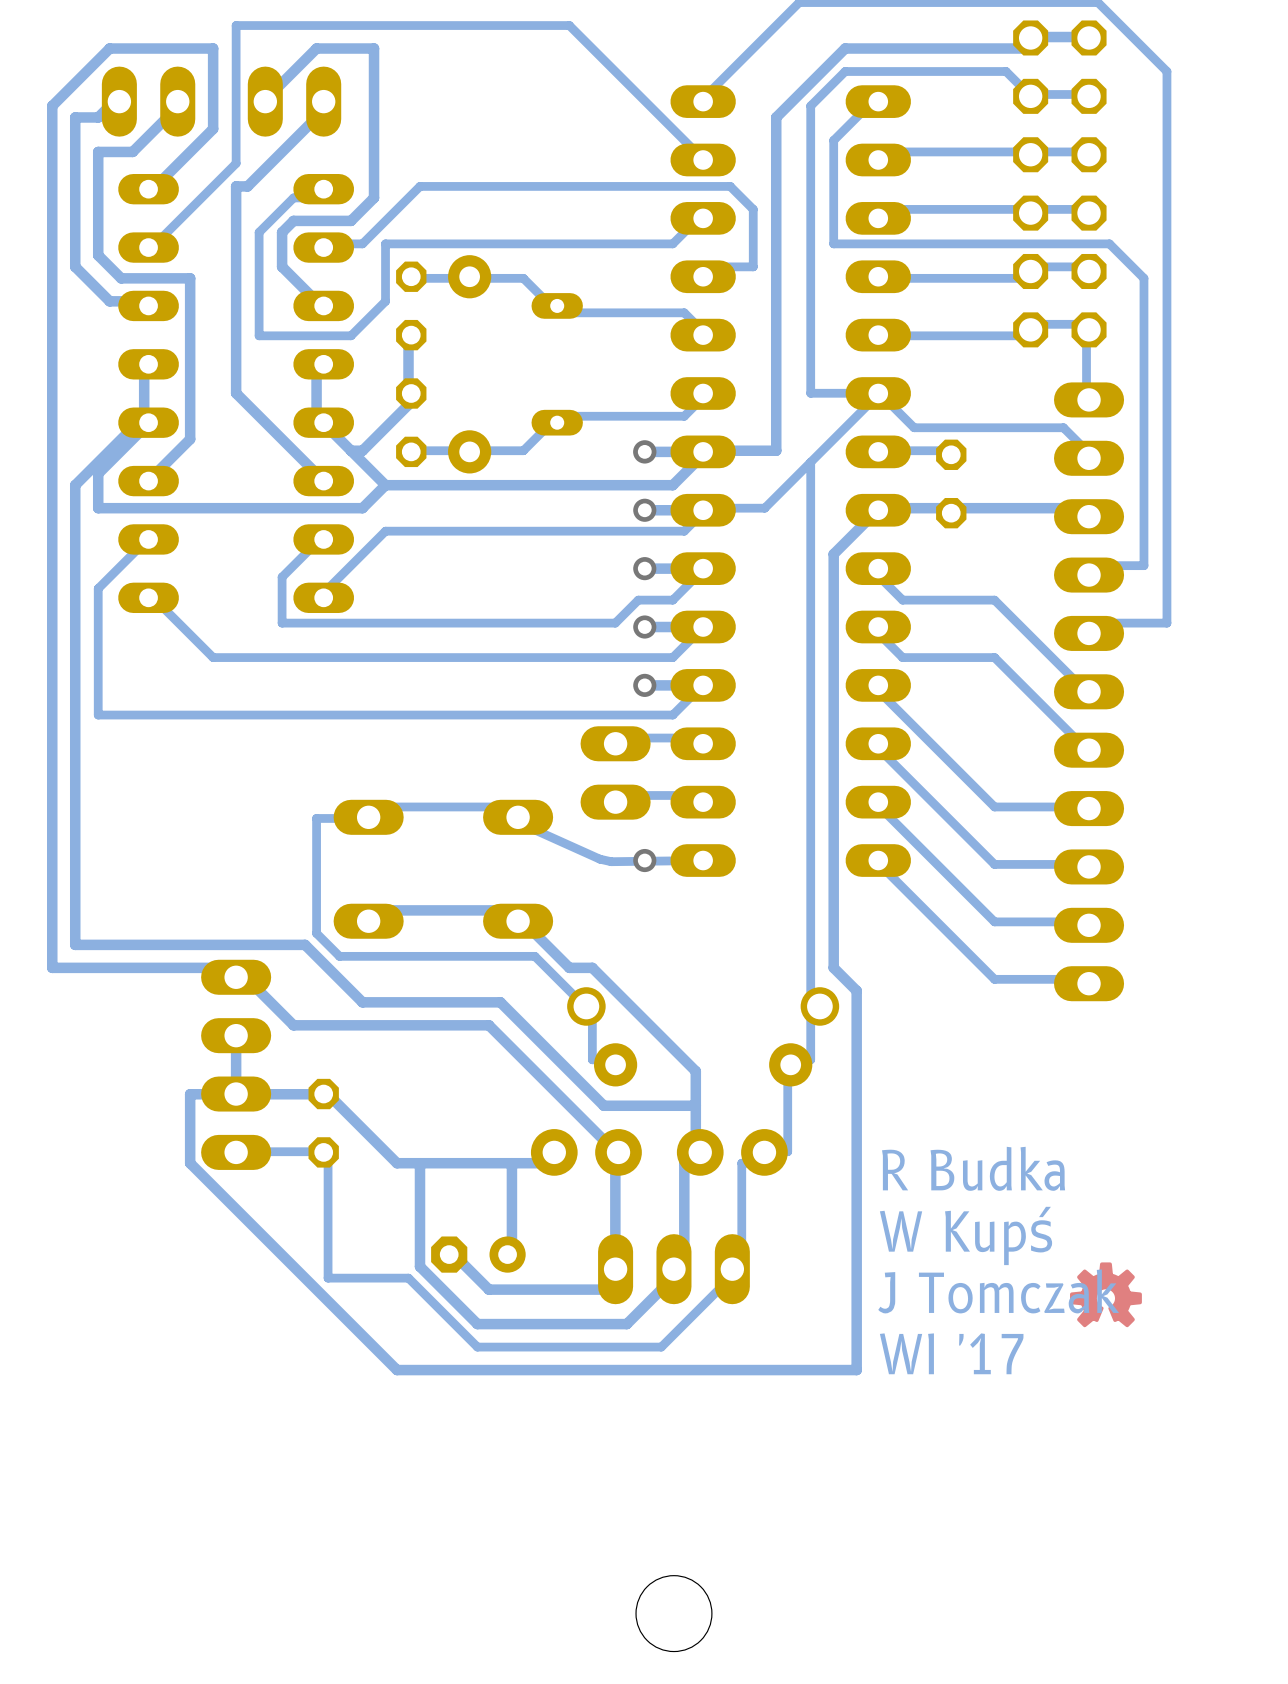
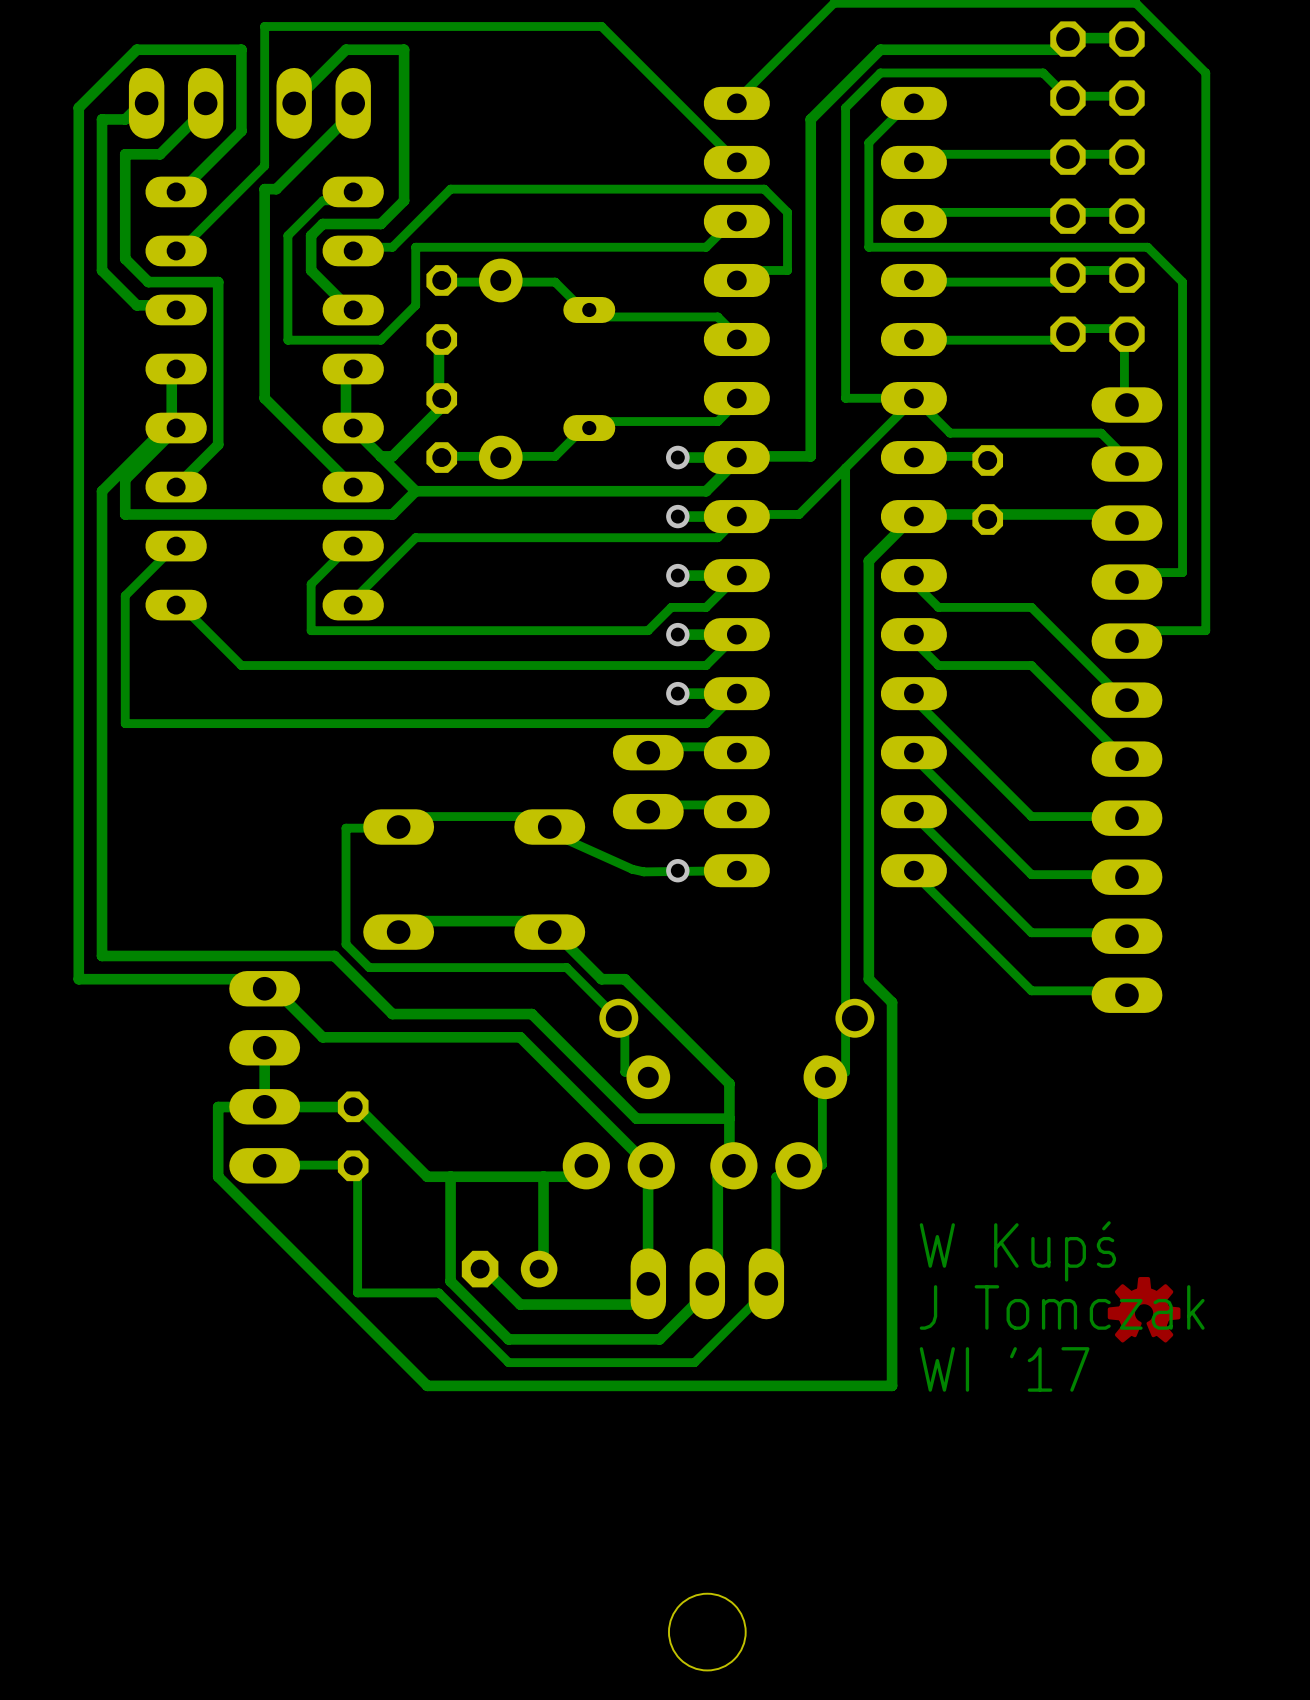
text: R Budka (973, 1168) -> none

